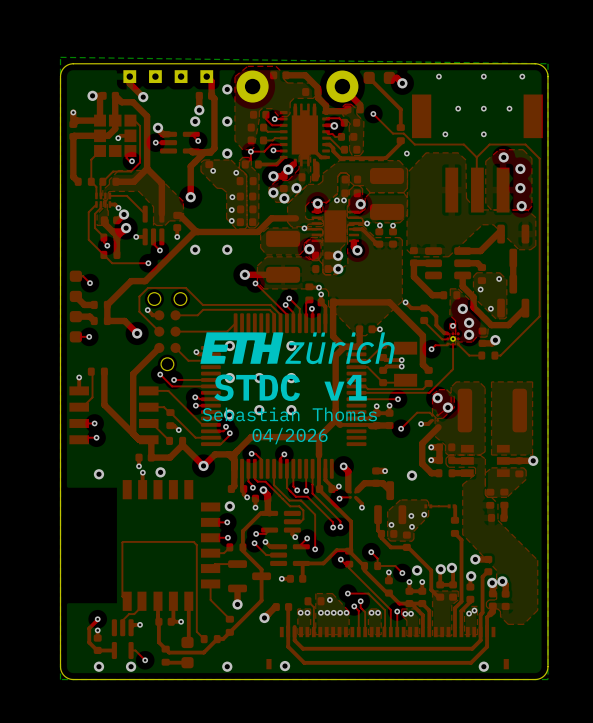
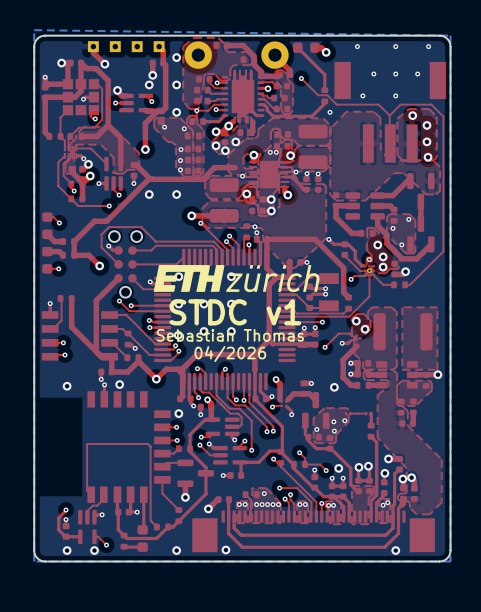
part footprint: [266, 626, 509, 670] -> [192, 510, 435, 553]

